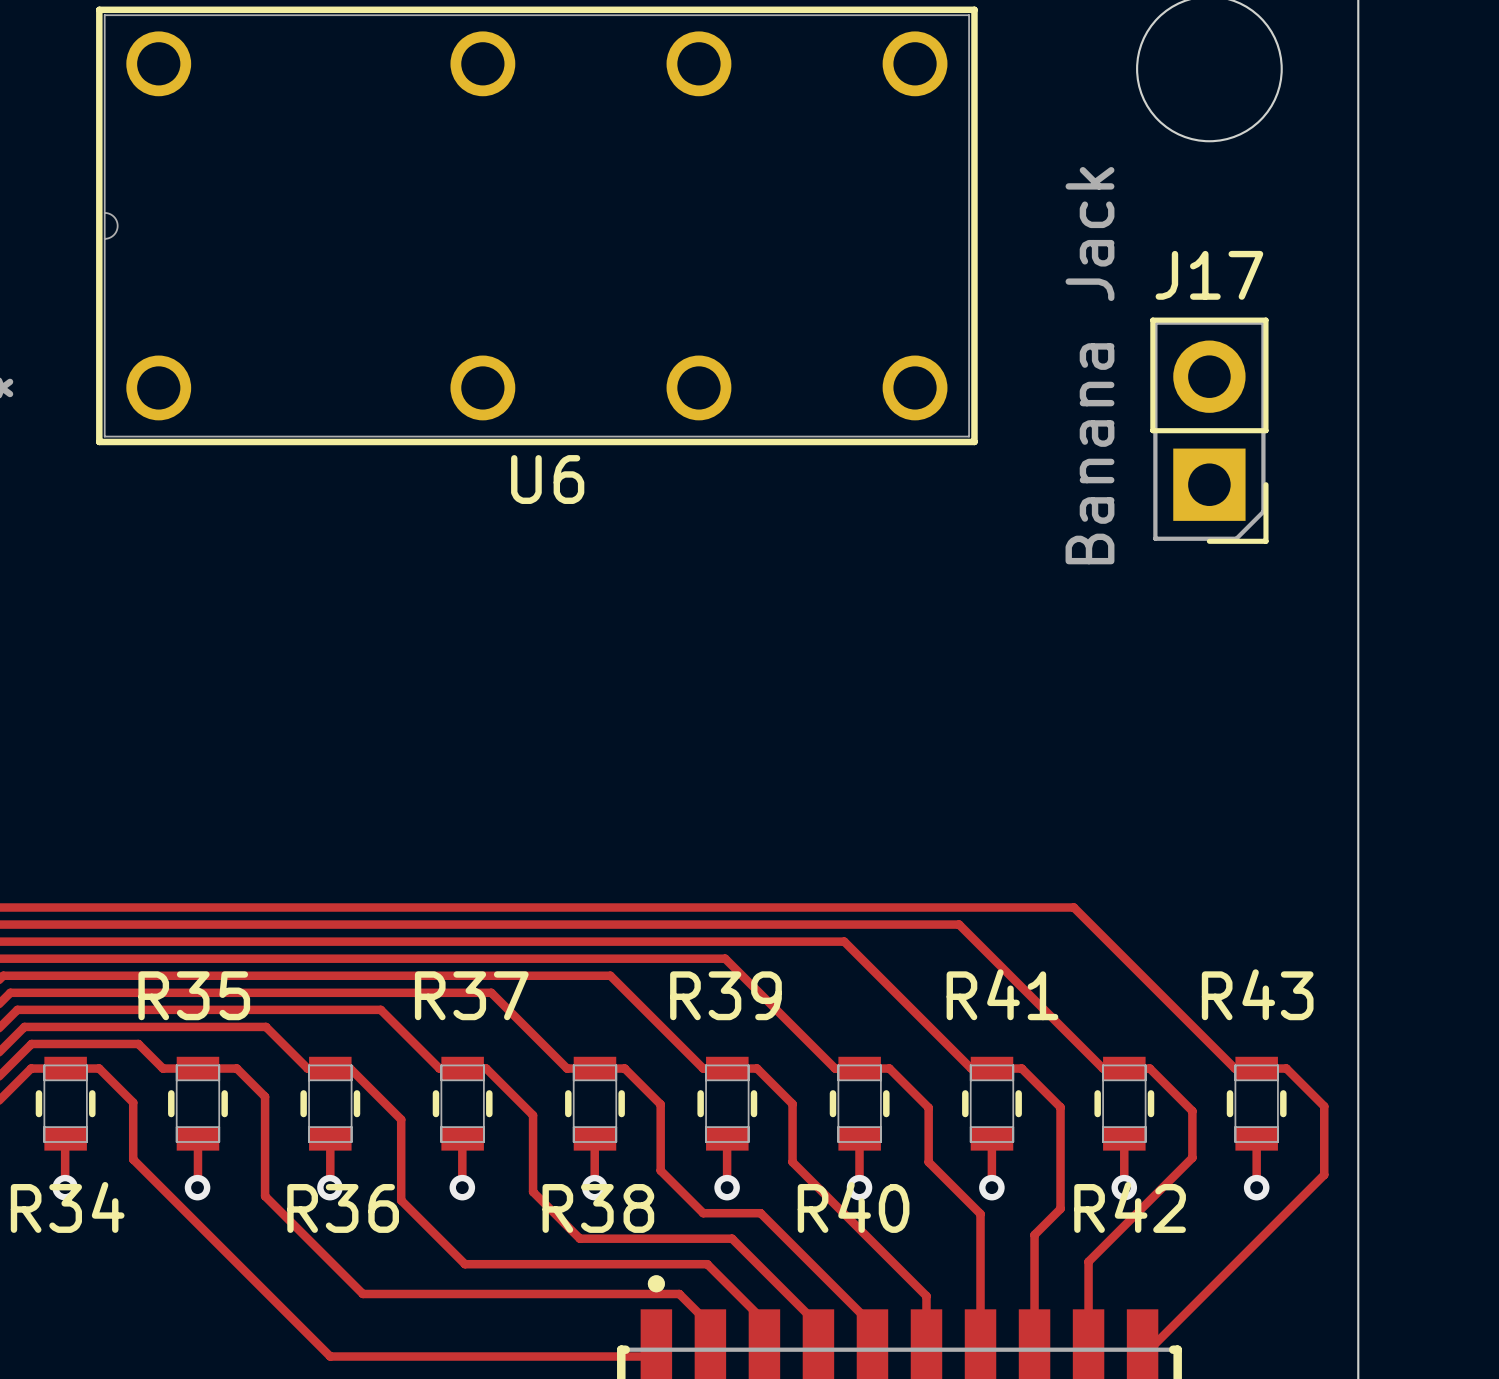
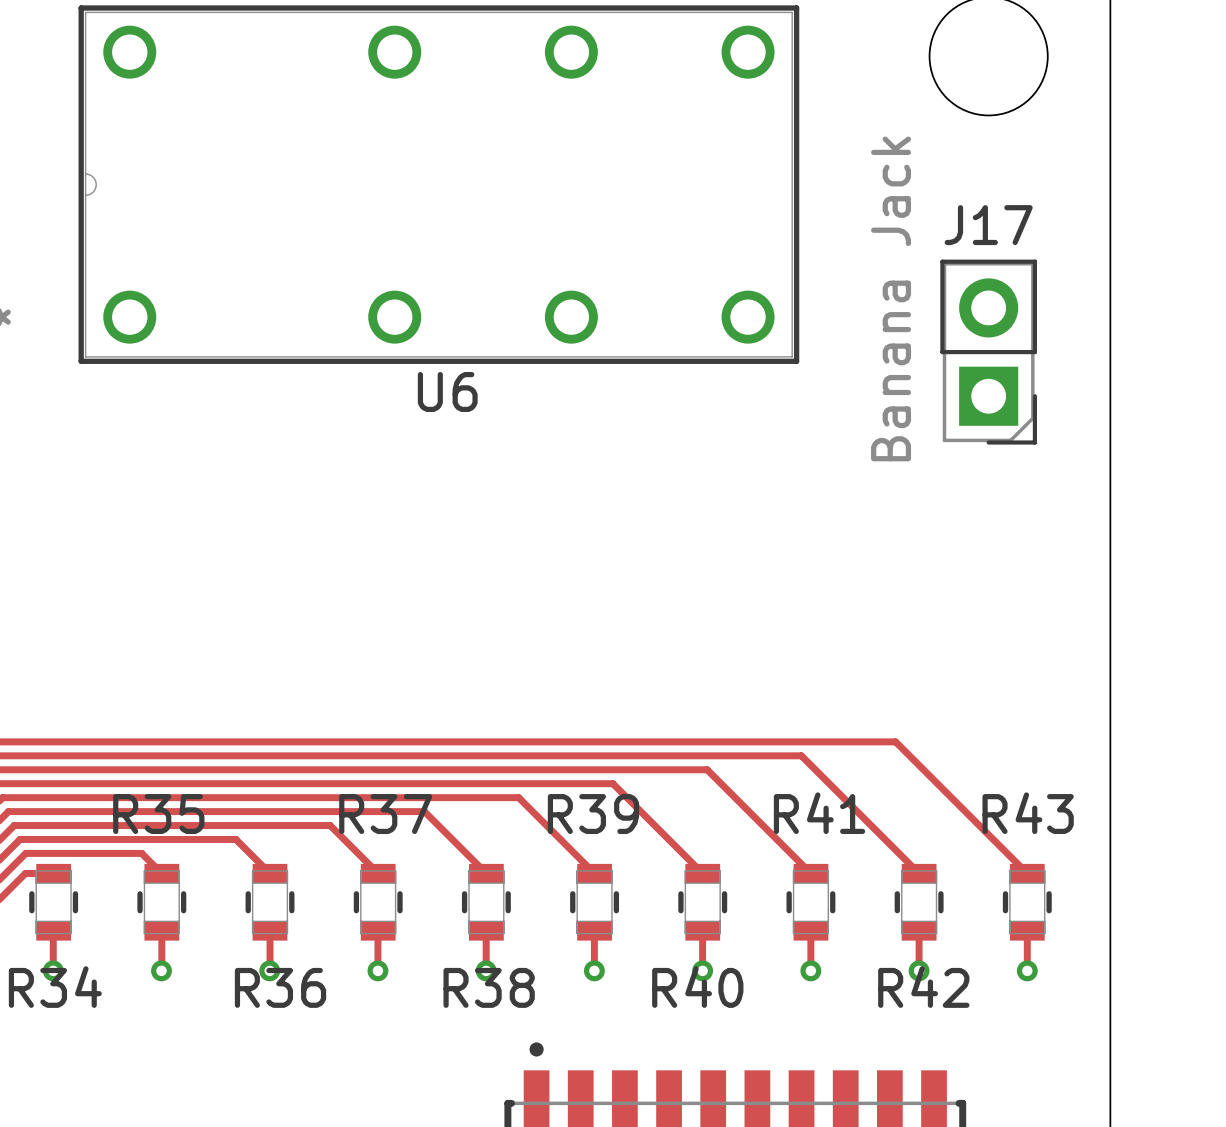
track: (1073, 907) (1234, 1068) (1286, 1068) (1324, 1106) (1324, 1174) (1142, 1356) -> (877, 741) (895, 741) (1027, 873)
track: (959, 924) (1103, 1068) (1149, 1068) (1192, 1111) (1192, 1157) (1088, 1261) (1088, 1356) -> (784, 755) (801, 755) (919, 873)
track: (844, 941) (971, 1068) (1021, 1068) (1060, 1107) (1060, 1208) (1034, 1234) (1034, 1356) -> (690, 769) (707, 769) (810, 873)
track: (725, 958) (835, 1068) (889, 1068) (928, 1107) (928, 1162) (980, 1213) (980, 1356) -> (592, 783) (612, 783) (702, 873)
track: (610, 975) (703, 1068) (757, 1068) (792, 1103) (792, 1162) (926, 1296) (926, 1356) -> (499, 797) (518, 797) (594, 873)
track: (491, 992) (567, 1068) (624, 1068) (660, 1104) (660, 1170) (703, 1213) (760, 1213) (872, 1325) (872, 1356) -> (401, 811) (424, 811) (486, 873)
track: (380, 1009) (439, 1068) (486, 1068) (533, 1115) (533, 1191) (579, 1238) (732, 1238) (818, 1325) (818, 1356) -> (311, 825) (330, 825) (378, 873)
track: (265, 1026) (307, 1068) (350, 1068) (401, 1119) (401, 1200) (465, 1264) (707, 1264) (764, 1321) (764, 1356) -> (217, 839) (235, 839) (270, 873)
track: (138, 1043) (162, 1068) (236, 1068) (265, 1096) (265, 1196) (362, 1293) (679, 1293) (710, 1325) (710, 1356) -> (113, 853) (141, 853) (161, 873)
track: (65, 1068) (99, 1068) (133, 1102) (133, 1159) (330, 1356) (656, 1356) -> none

